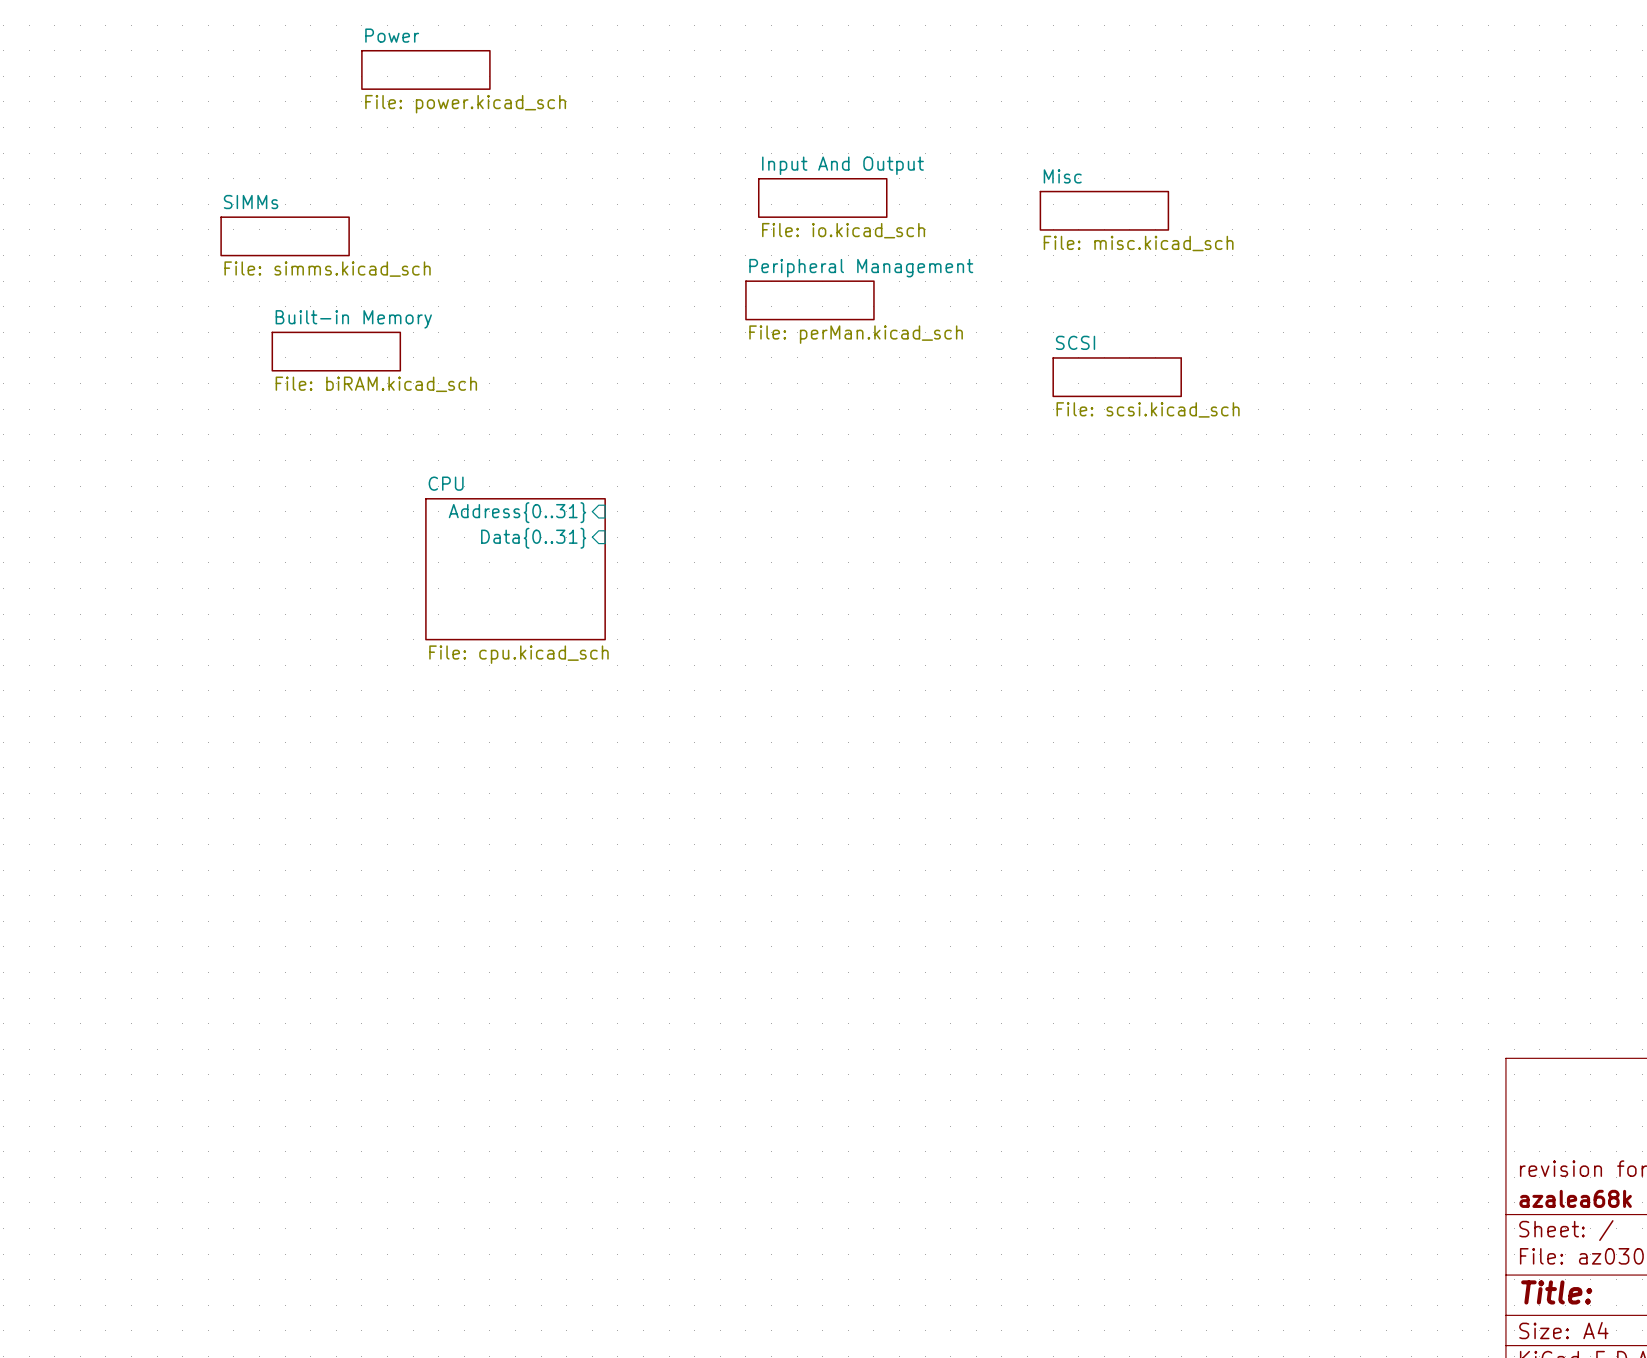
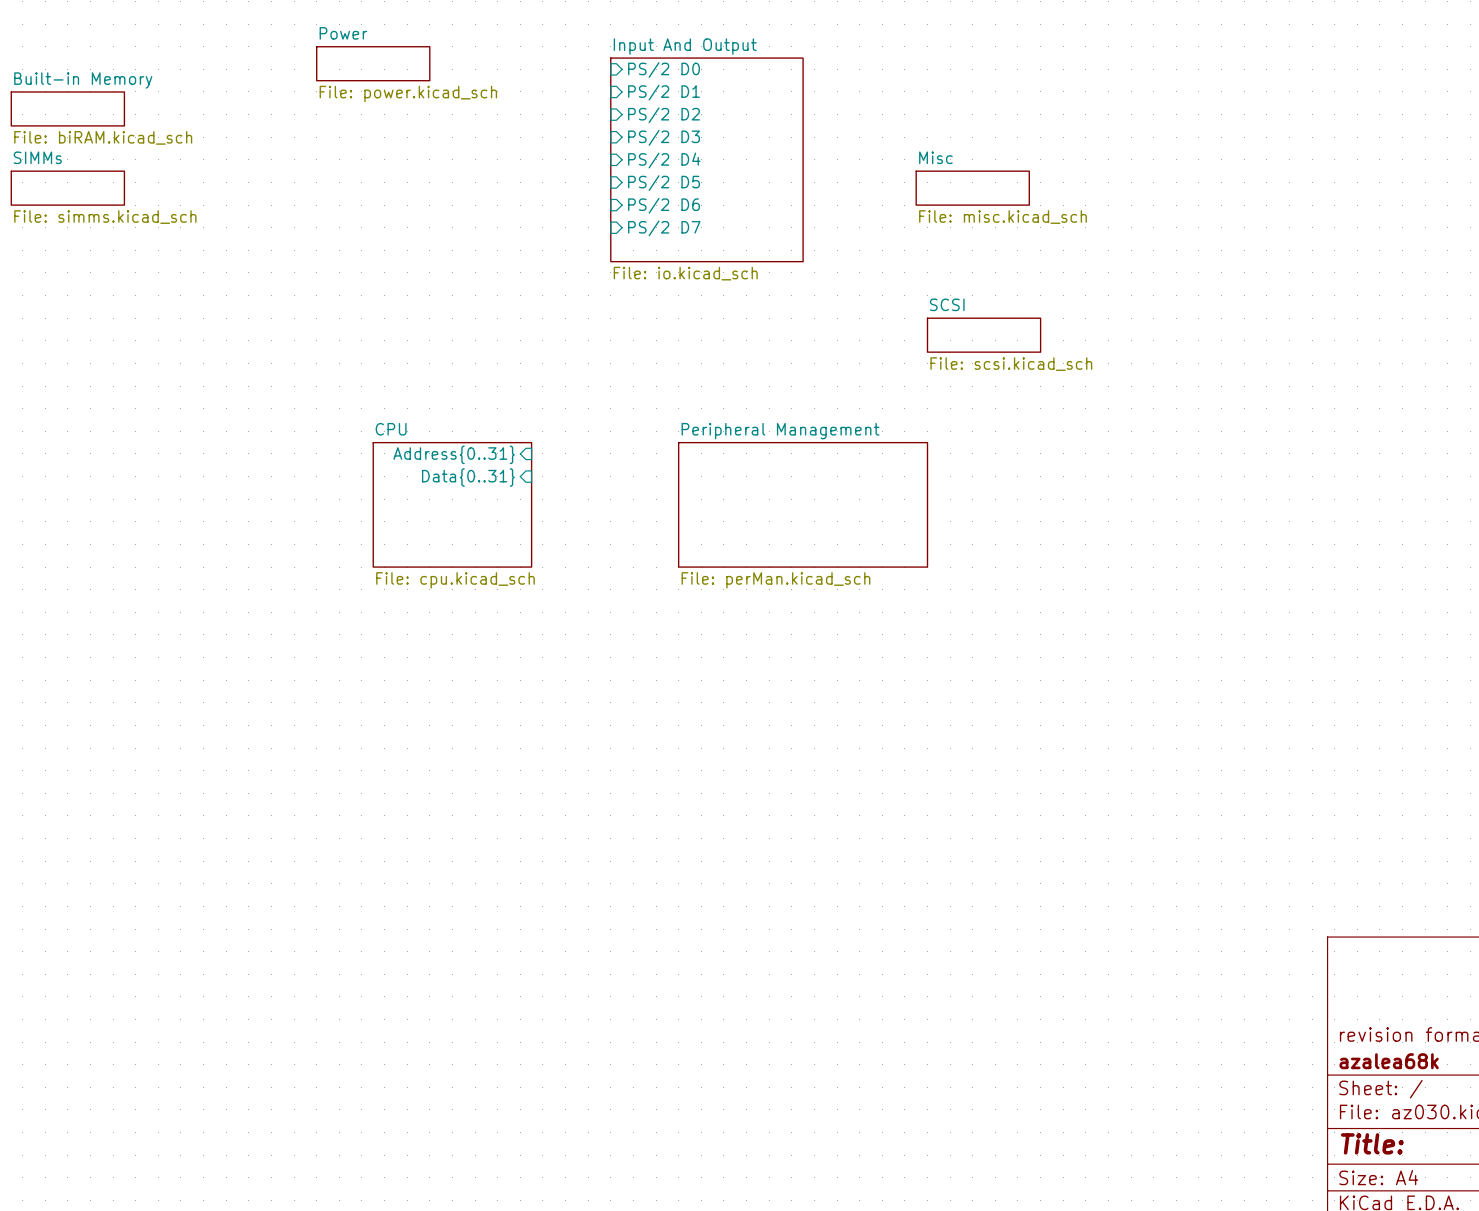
sheet pin: none -> PS/2 D0 (664, 70)
sheet pin: none -> PS/2 D1 (664, 92)
sheet Built-in Memory: none -> File: biRAM.kicad_sch (67, 108)
sheet pin: none -> PS/2 D2 (664, 115)
sheet pin: none -> PS/2 D3 (664, 137)
sheet Input And Output: none -> File: io.kicad_sch (706, 159)
sheet pin: none -> PS/2 D4 (664, 160)
sheet Input And Output: File: io.kicad_sch (822, 197) -> none
sheet pin: none -> PS/2 D5 (664, 183)
sheet pin: none -> PS/2 D6 (664, 205)
sheet SIMMs position: (285, 236) -> (67, 188)
sheet pin: none -> PS/2 D7 (664, 228)
sheet Peripheral Management: File: perMan.kicad_sch (809, 300) -> none
sheet Built-in Memory: File: biRAM.kicad_sch (336, 351) -> none
sheet Peripheral Management: none -> File: perMan.kicad_sch (803, 504)

